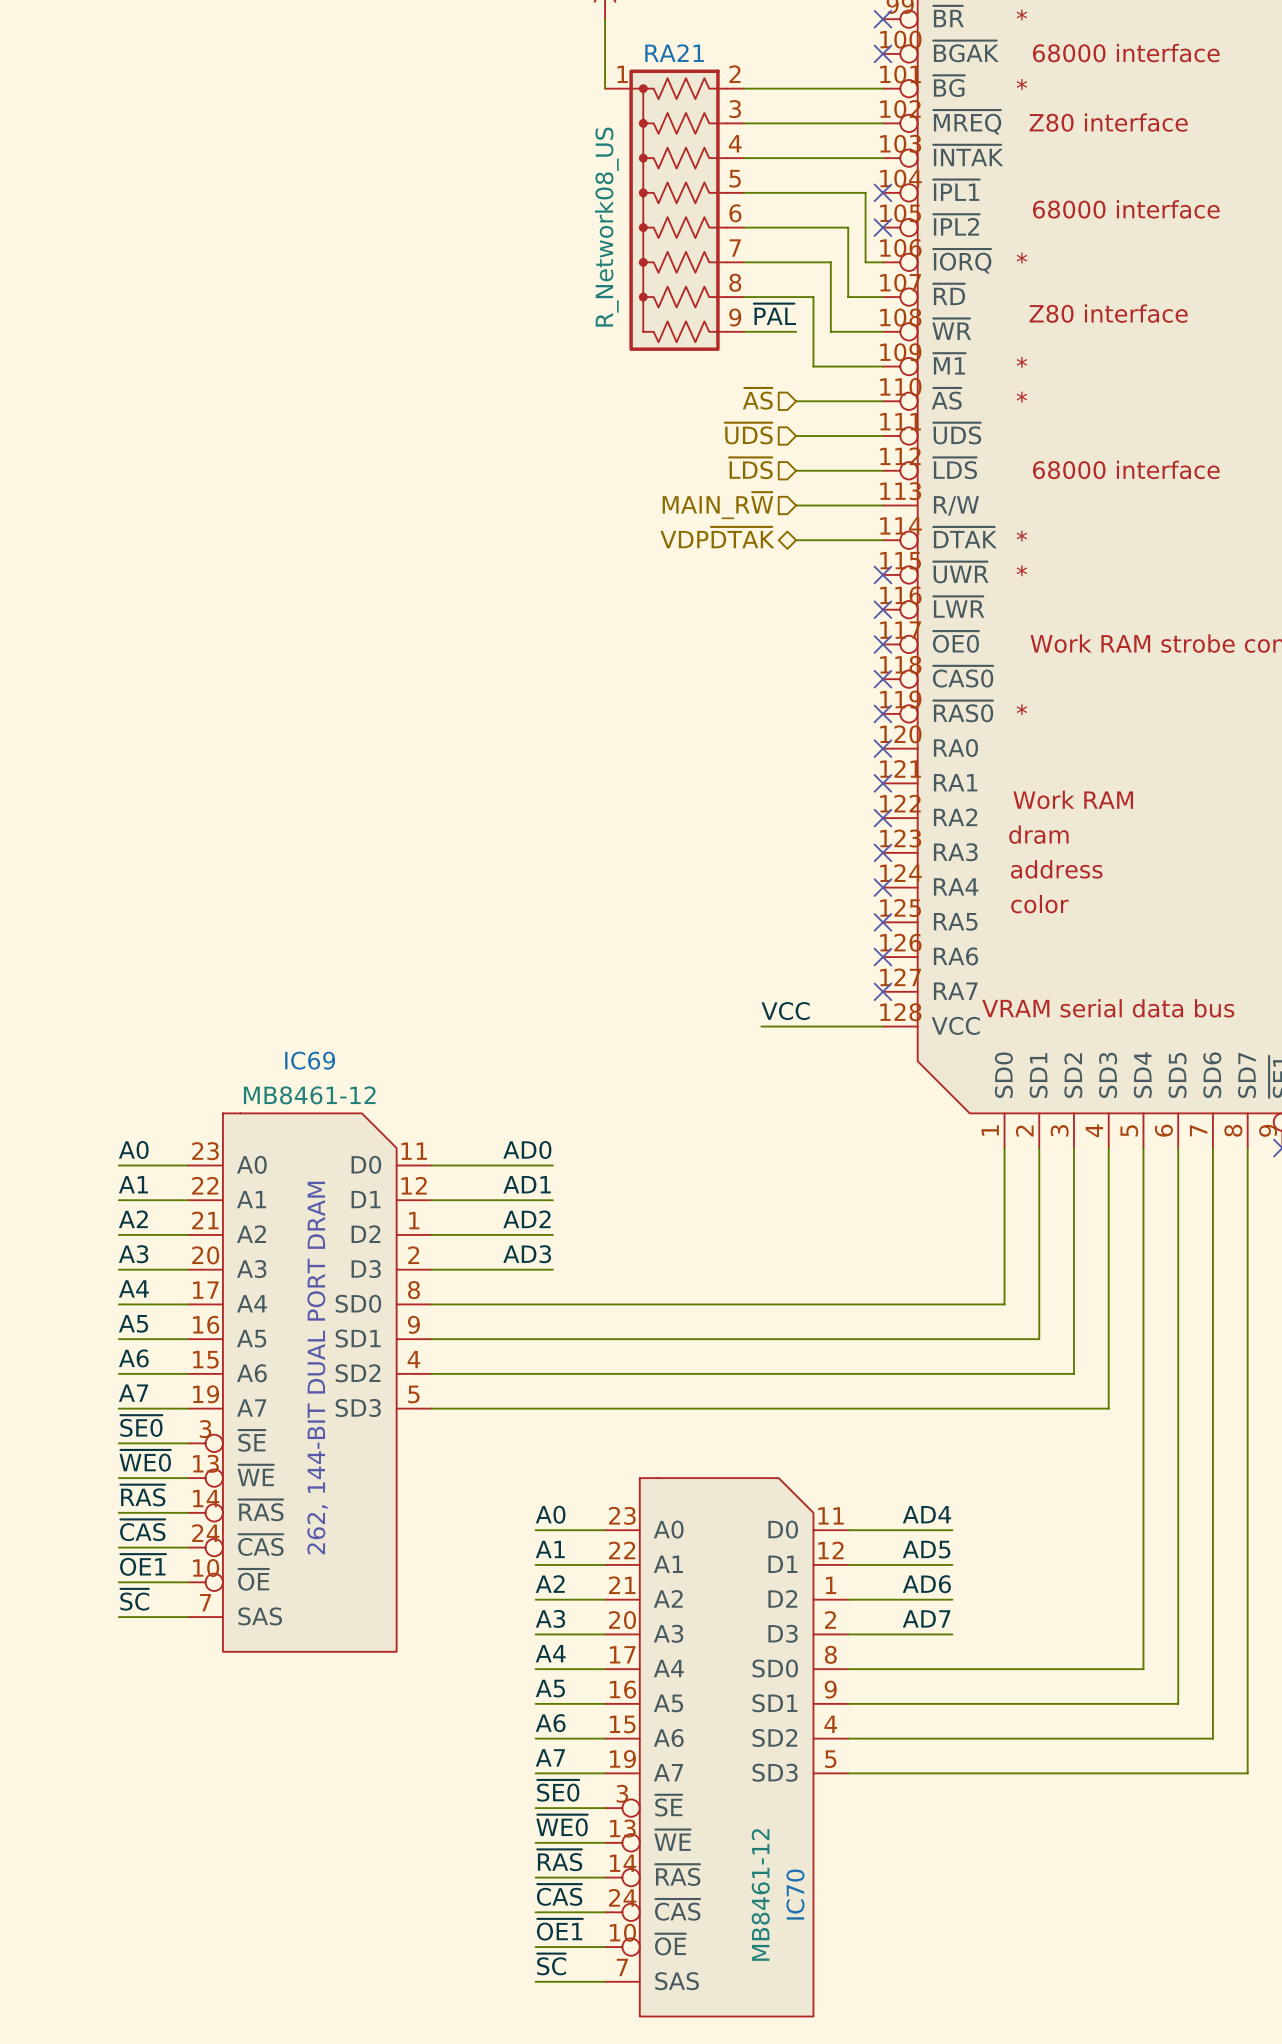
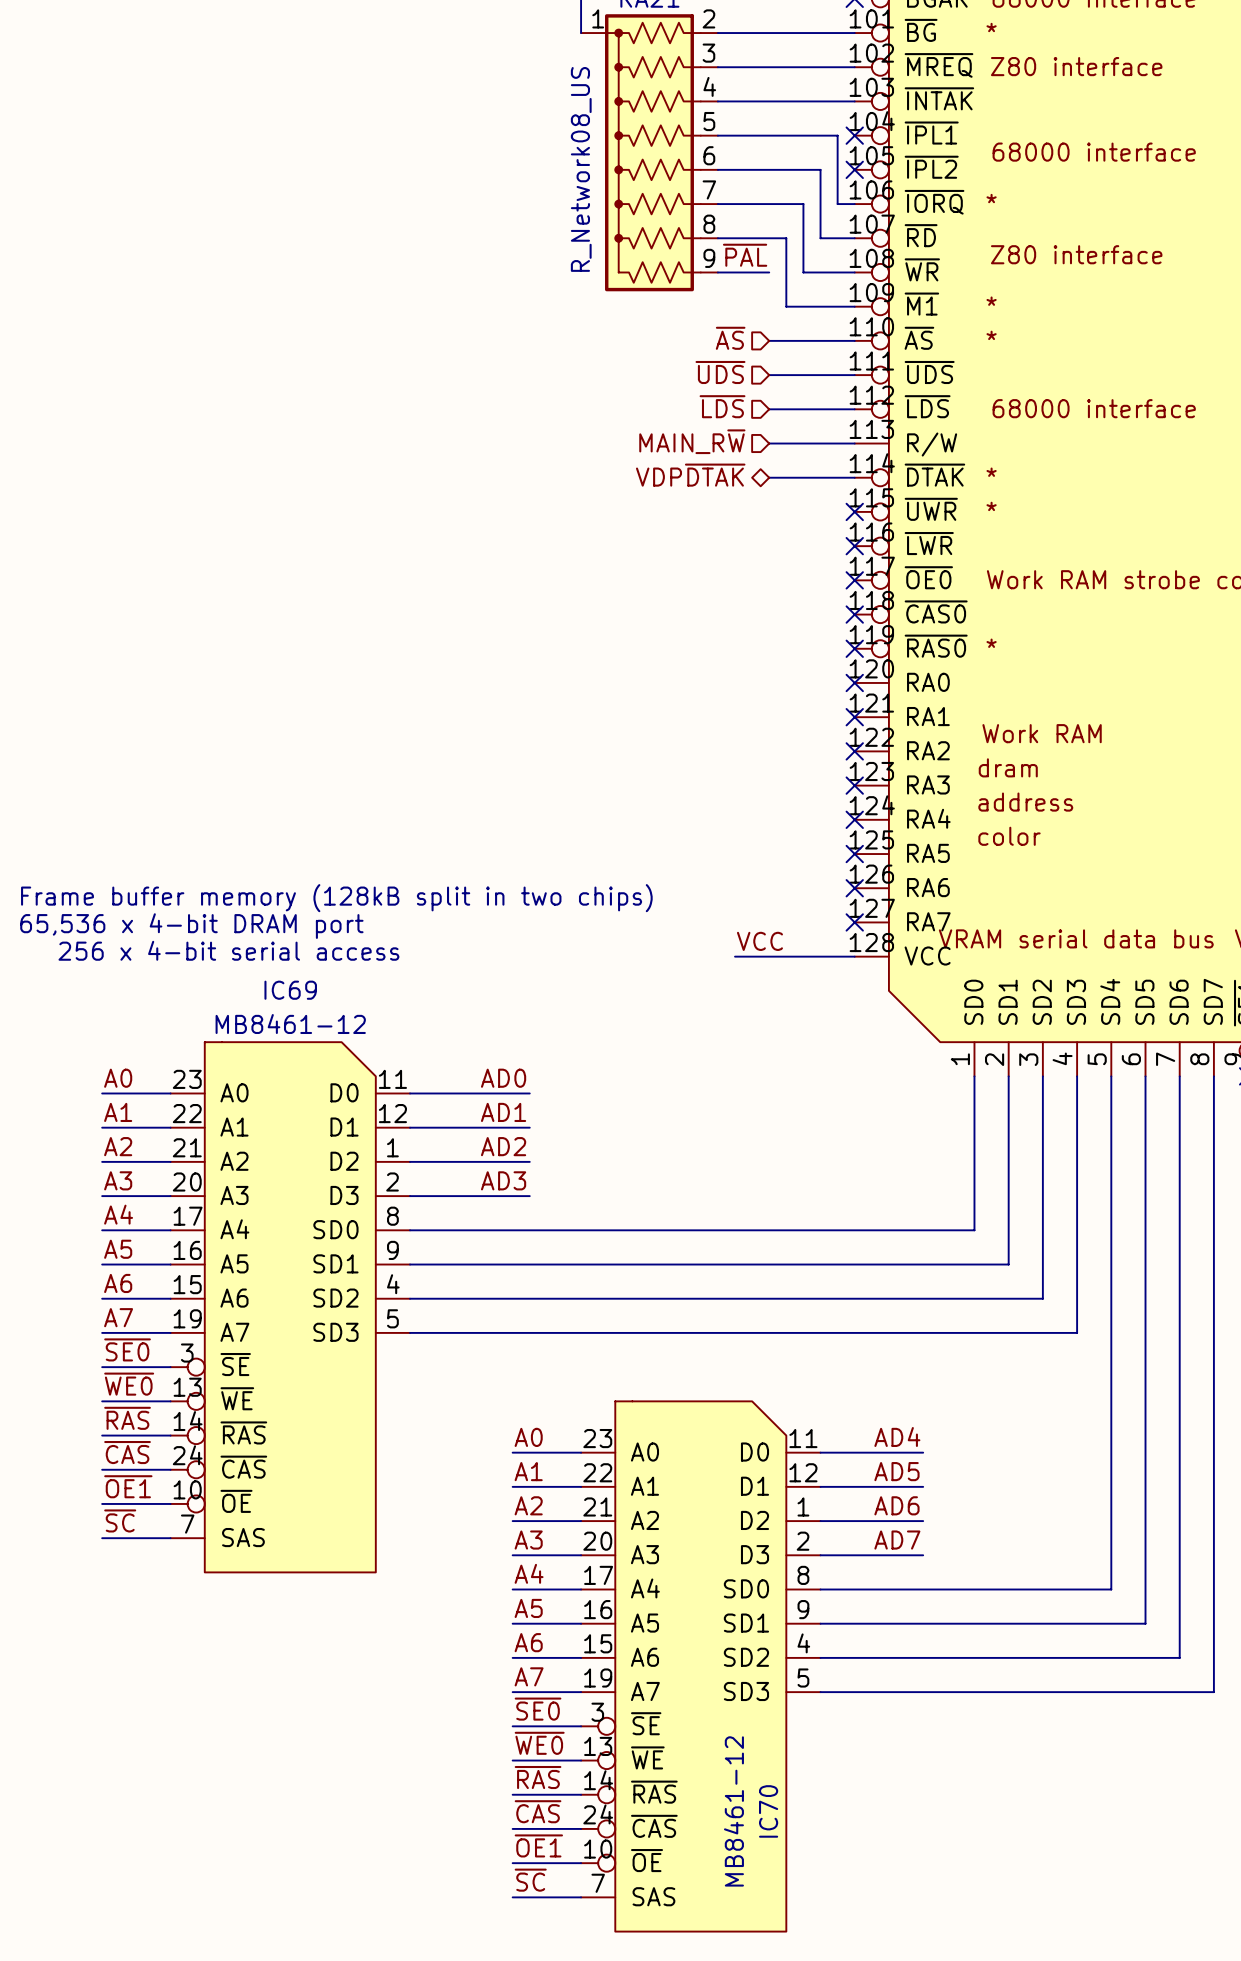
text: none -> Frame buffer memory (128kB split in two chips) (336, 898)
text: none -> 65,536 x 4-bit DRAM port (191, 926)
text: none -> 256 x 4-bit serial access (228, 950)
text: 262, 144-BIT DUAL PORT DRAM (317, 1368) -> none

